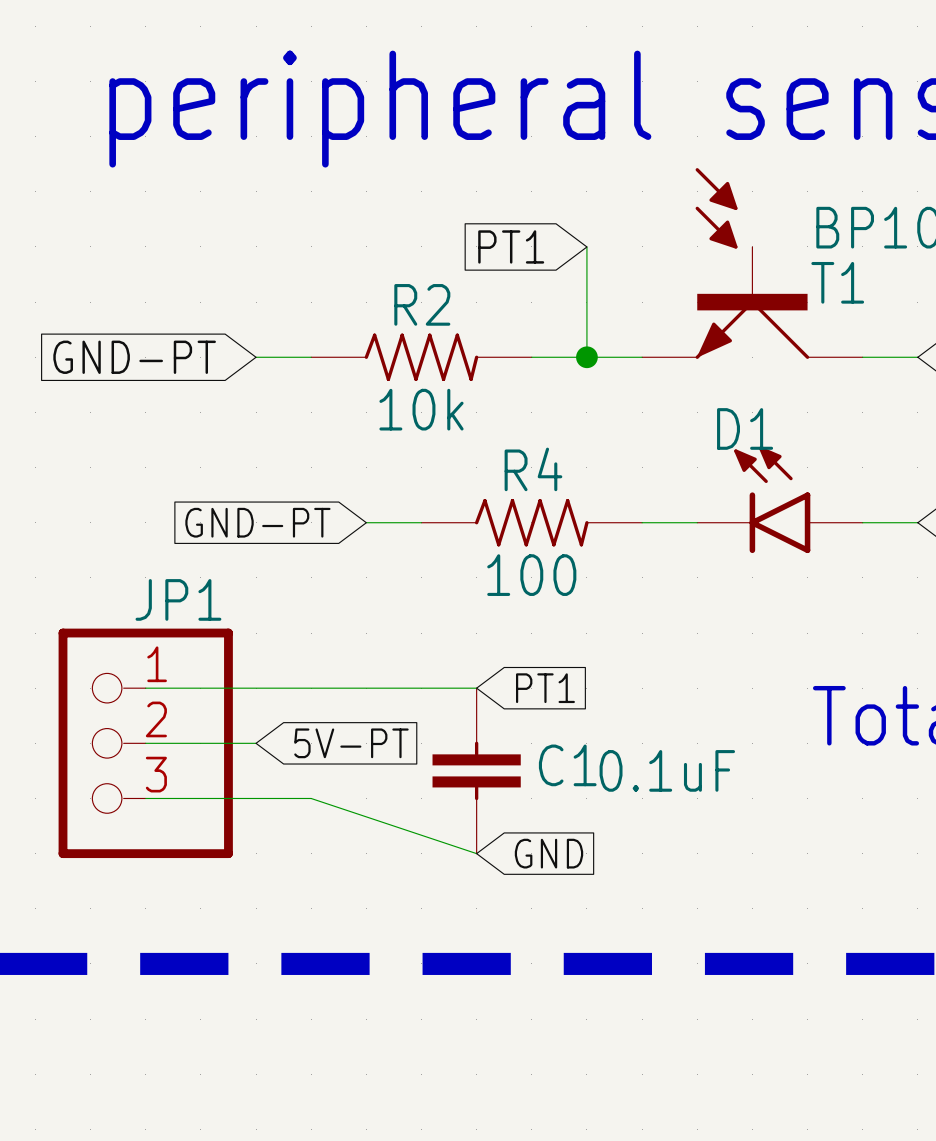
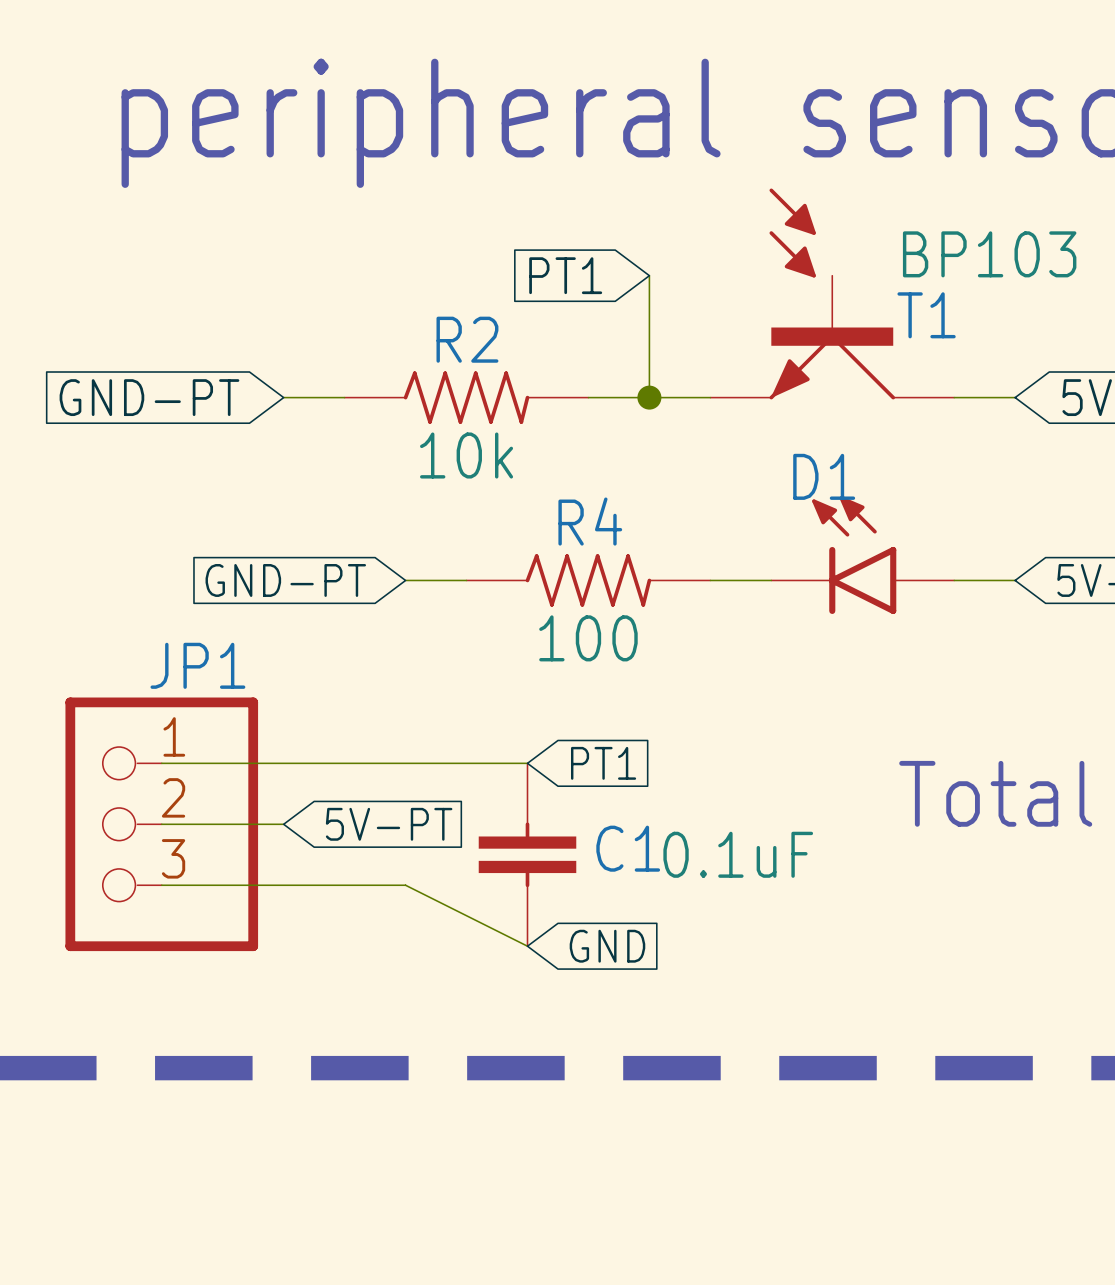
wire: (311, 798) (476, 853) -> (344, 885) (405, 885) (527, 946)

